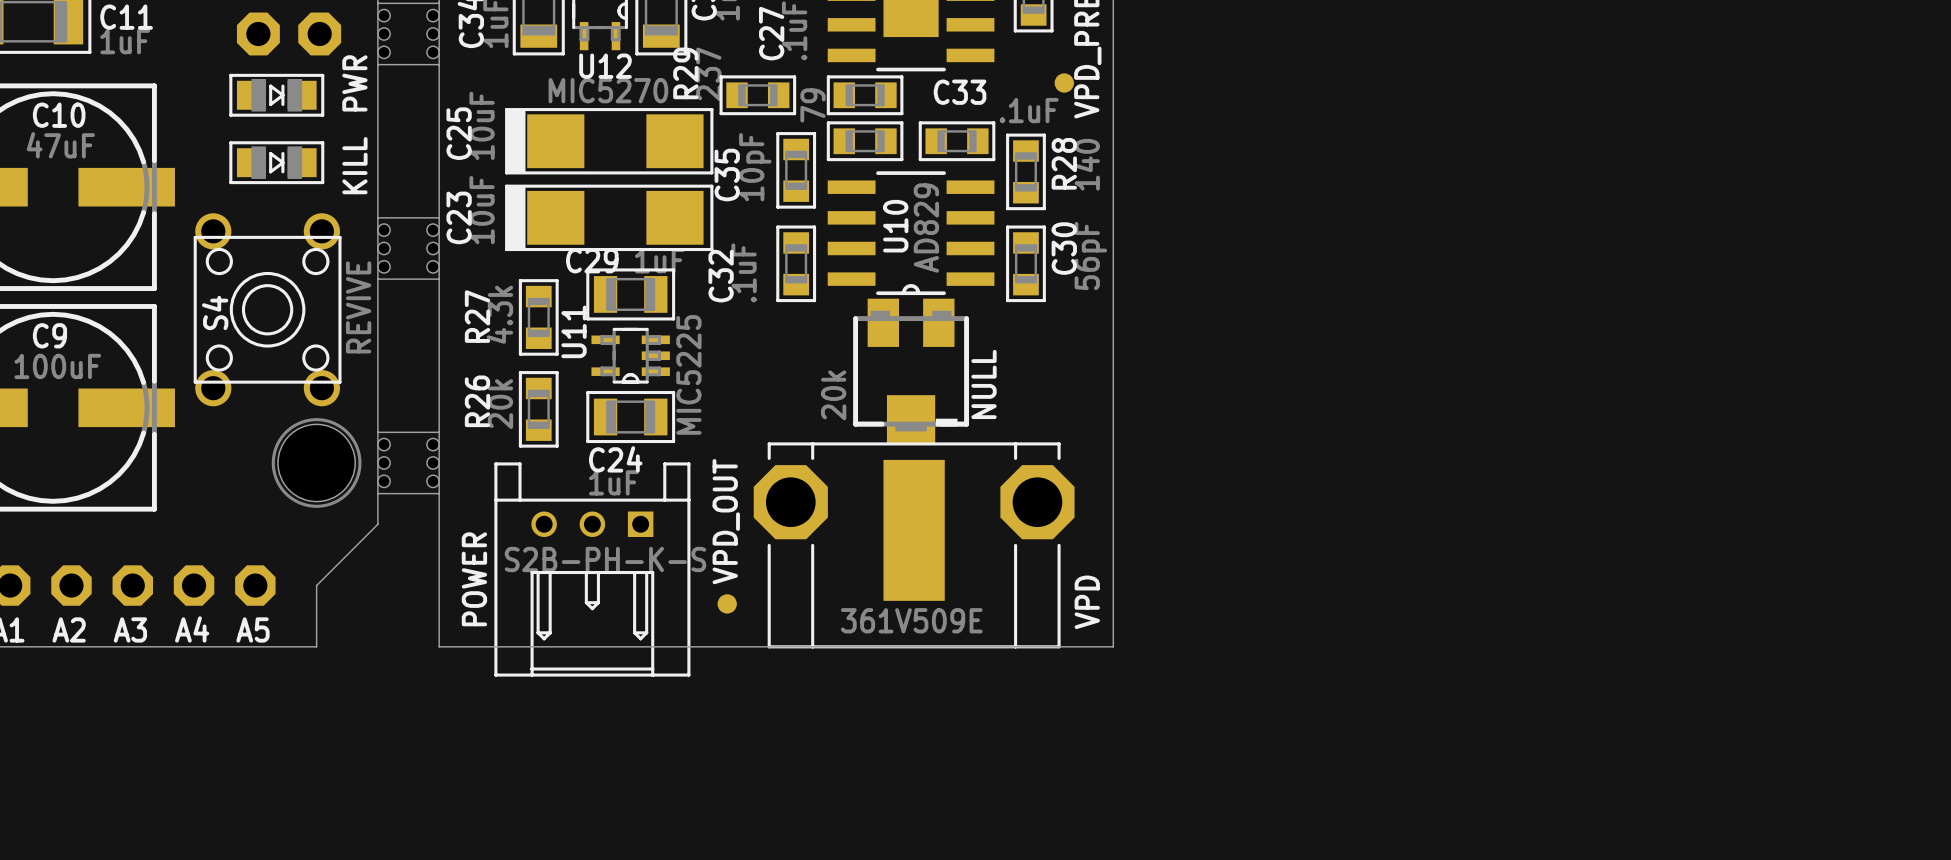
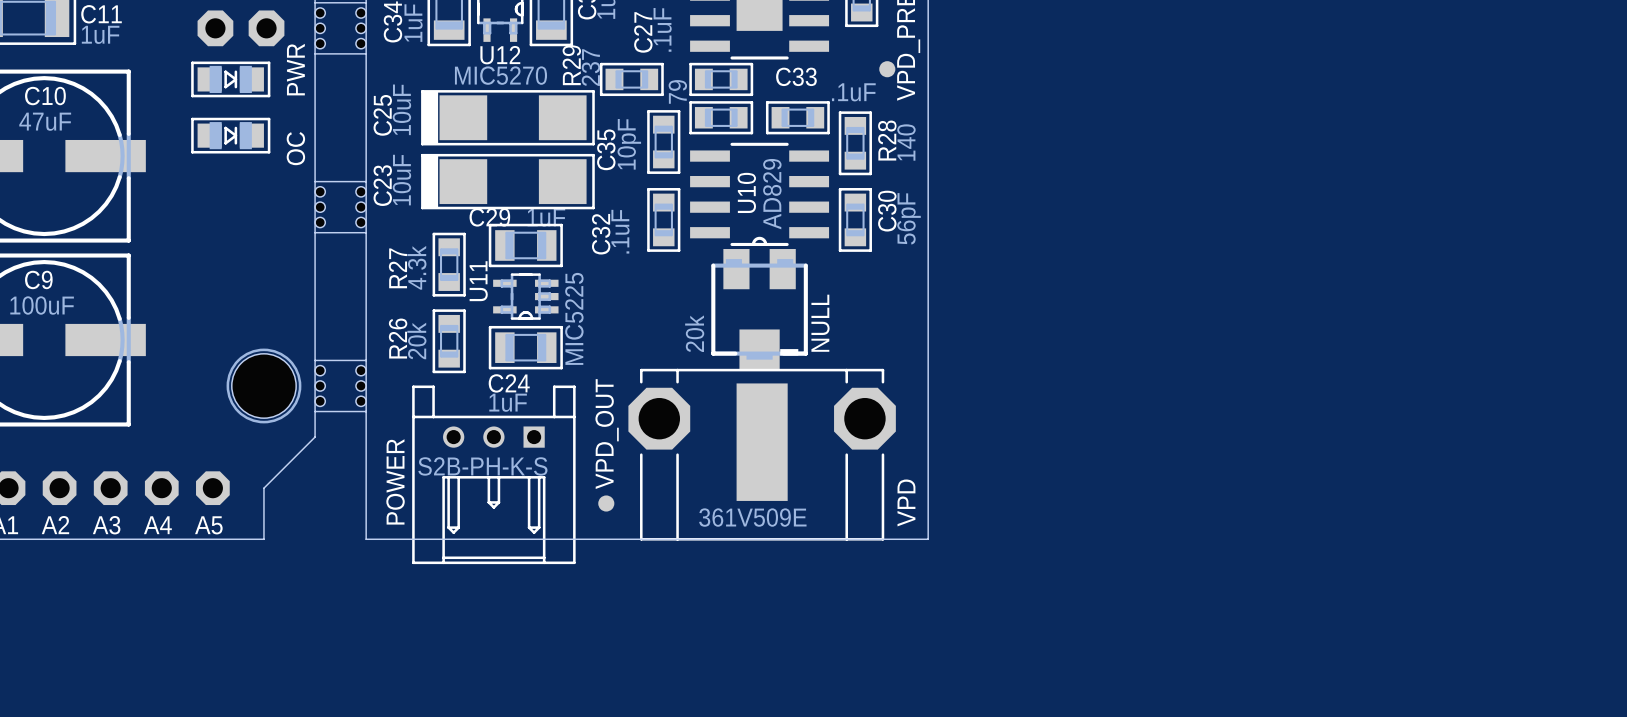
KILL name: KILL (354, 165) -> OC (295, 148)
S4: REVIVE (267, 309) -> none

